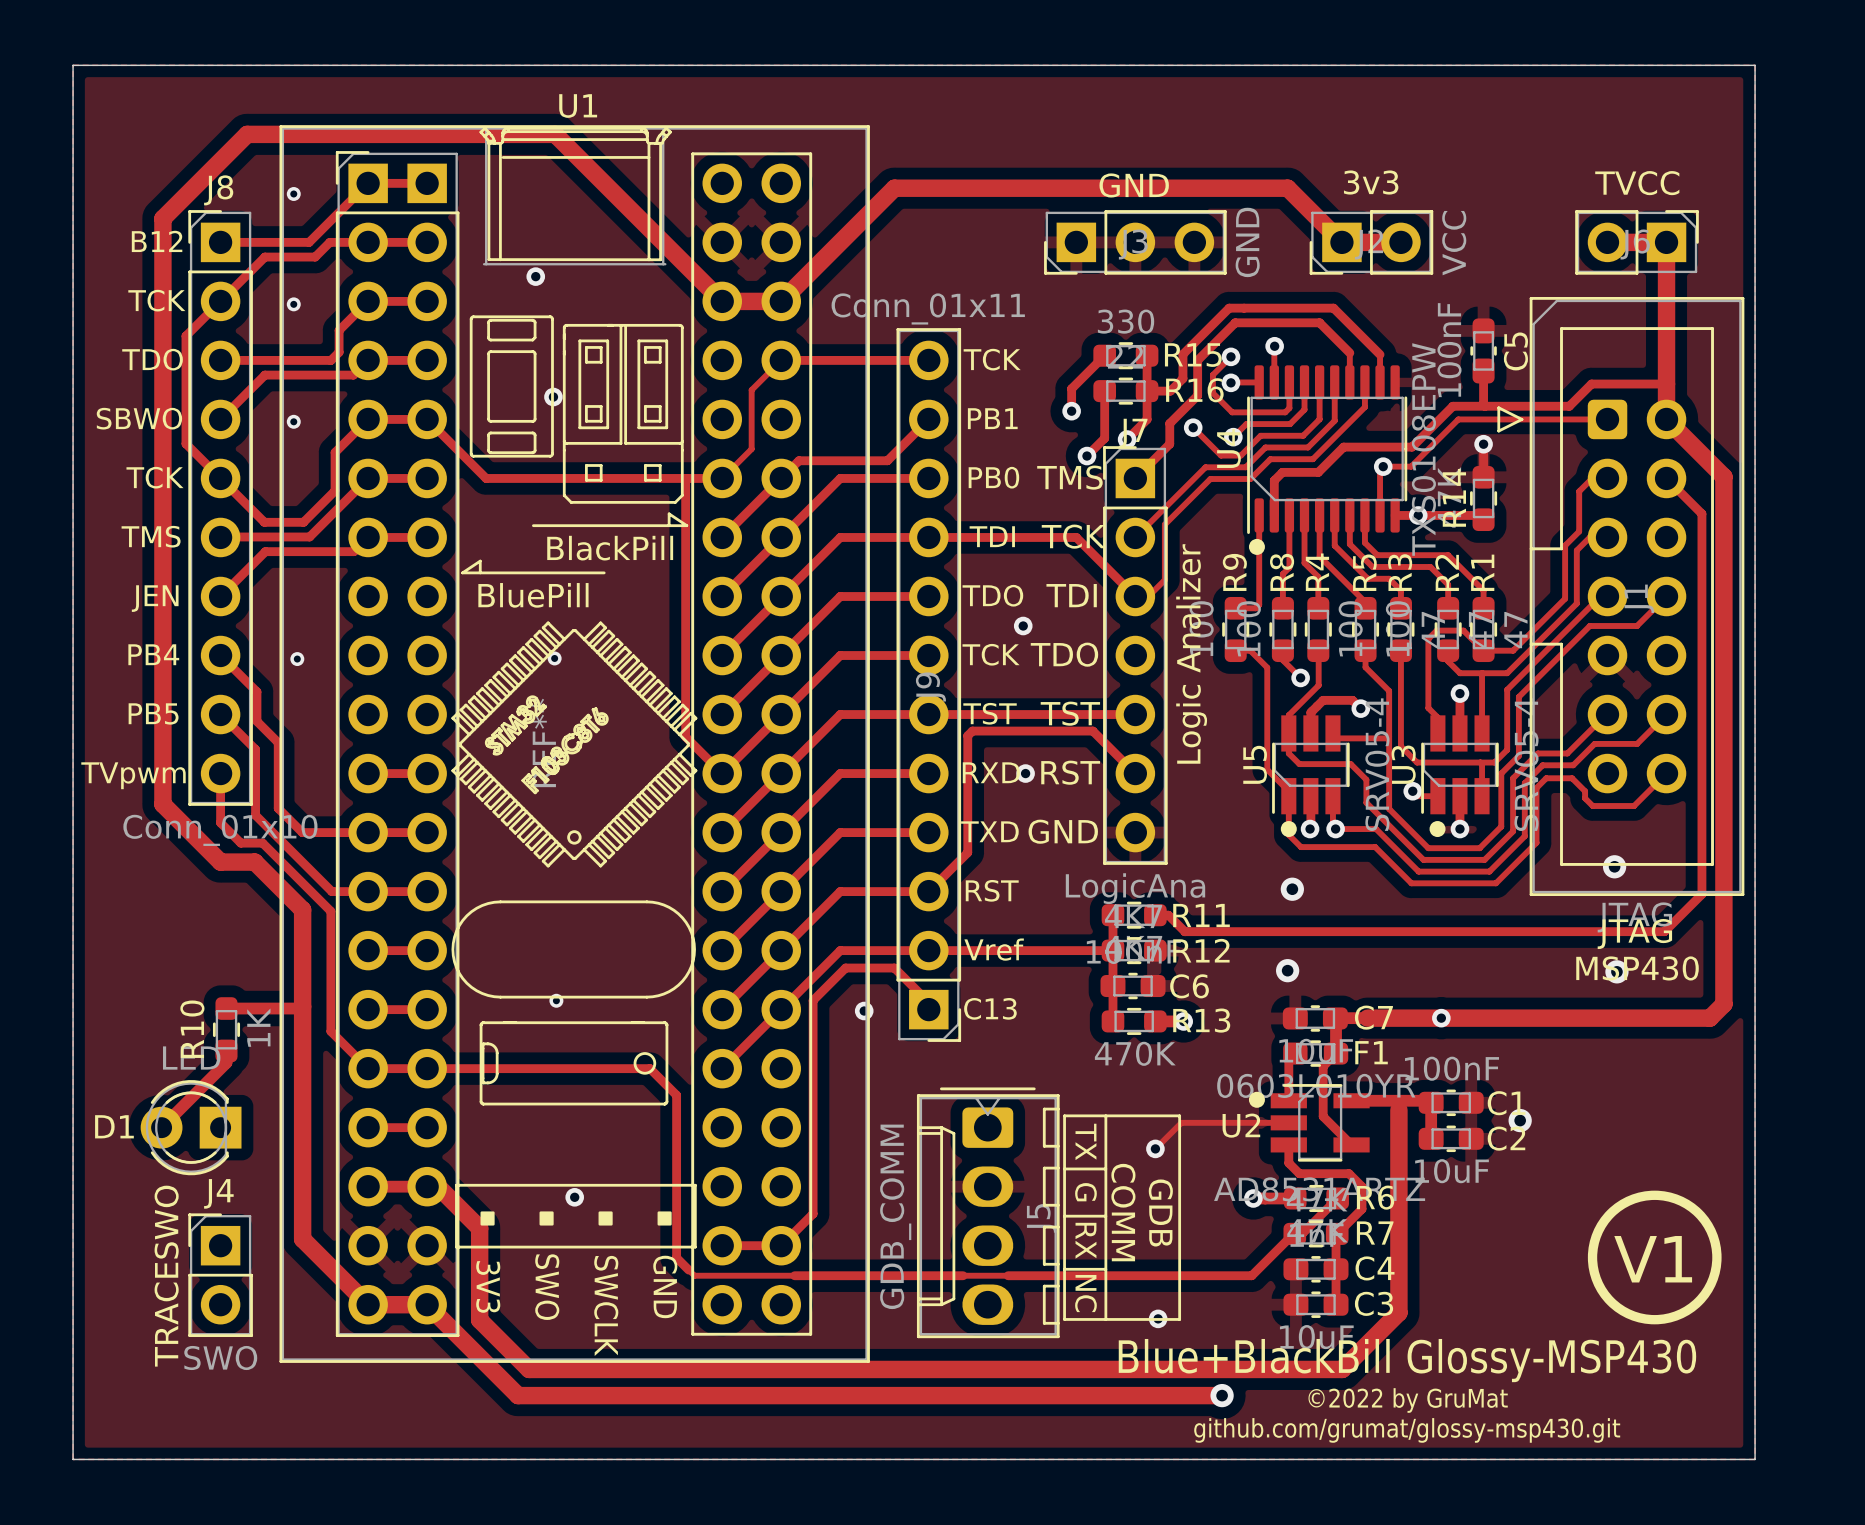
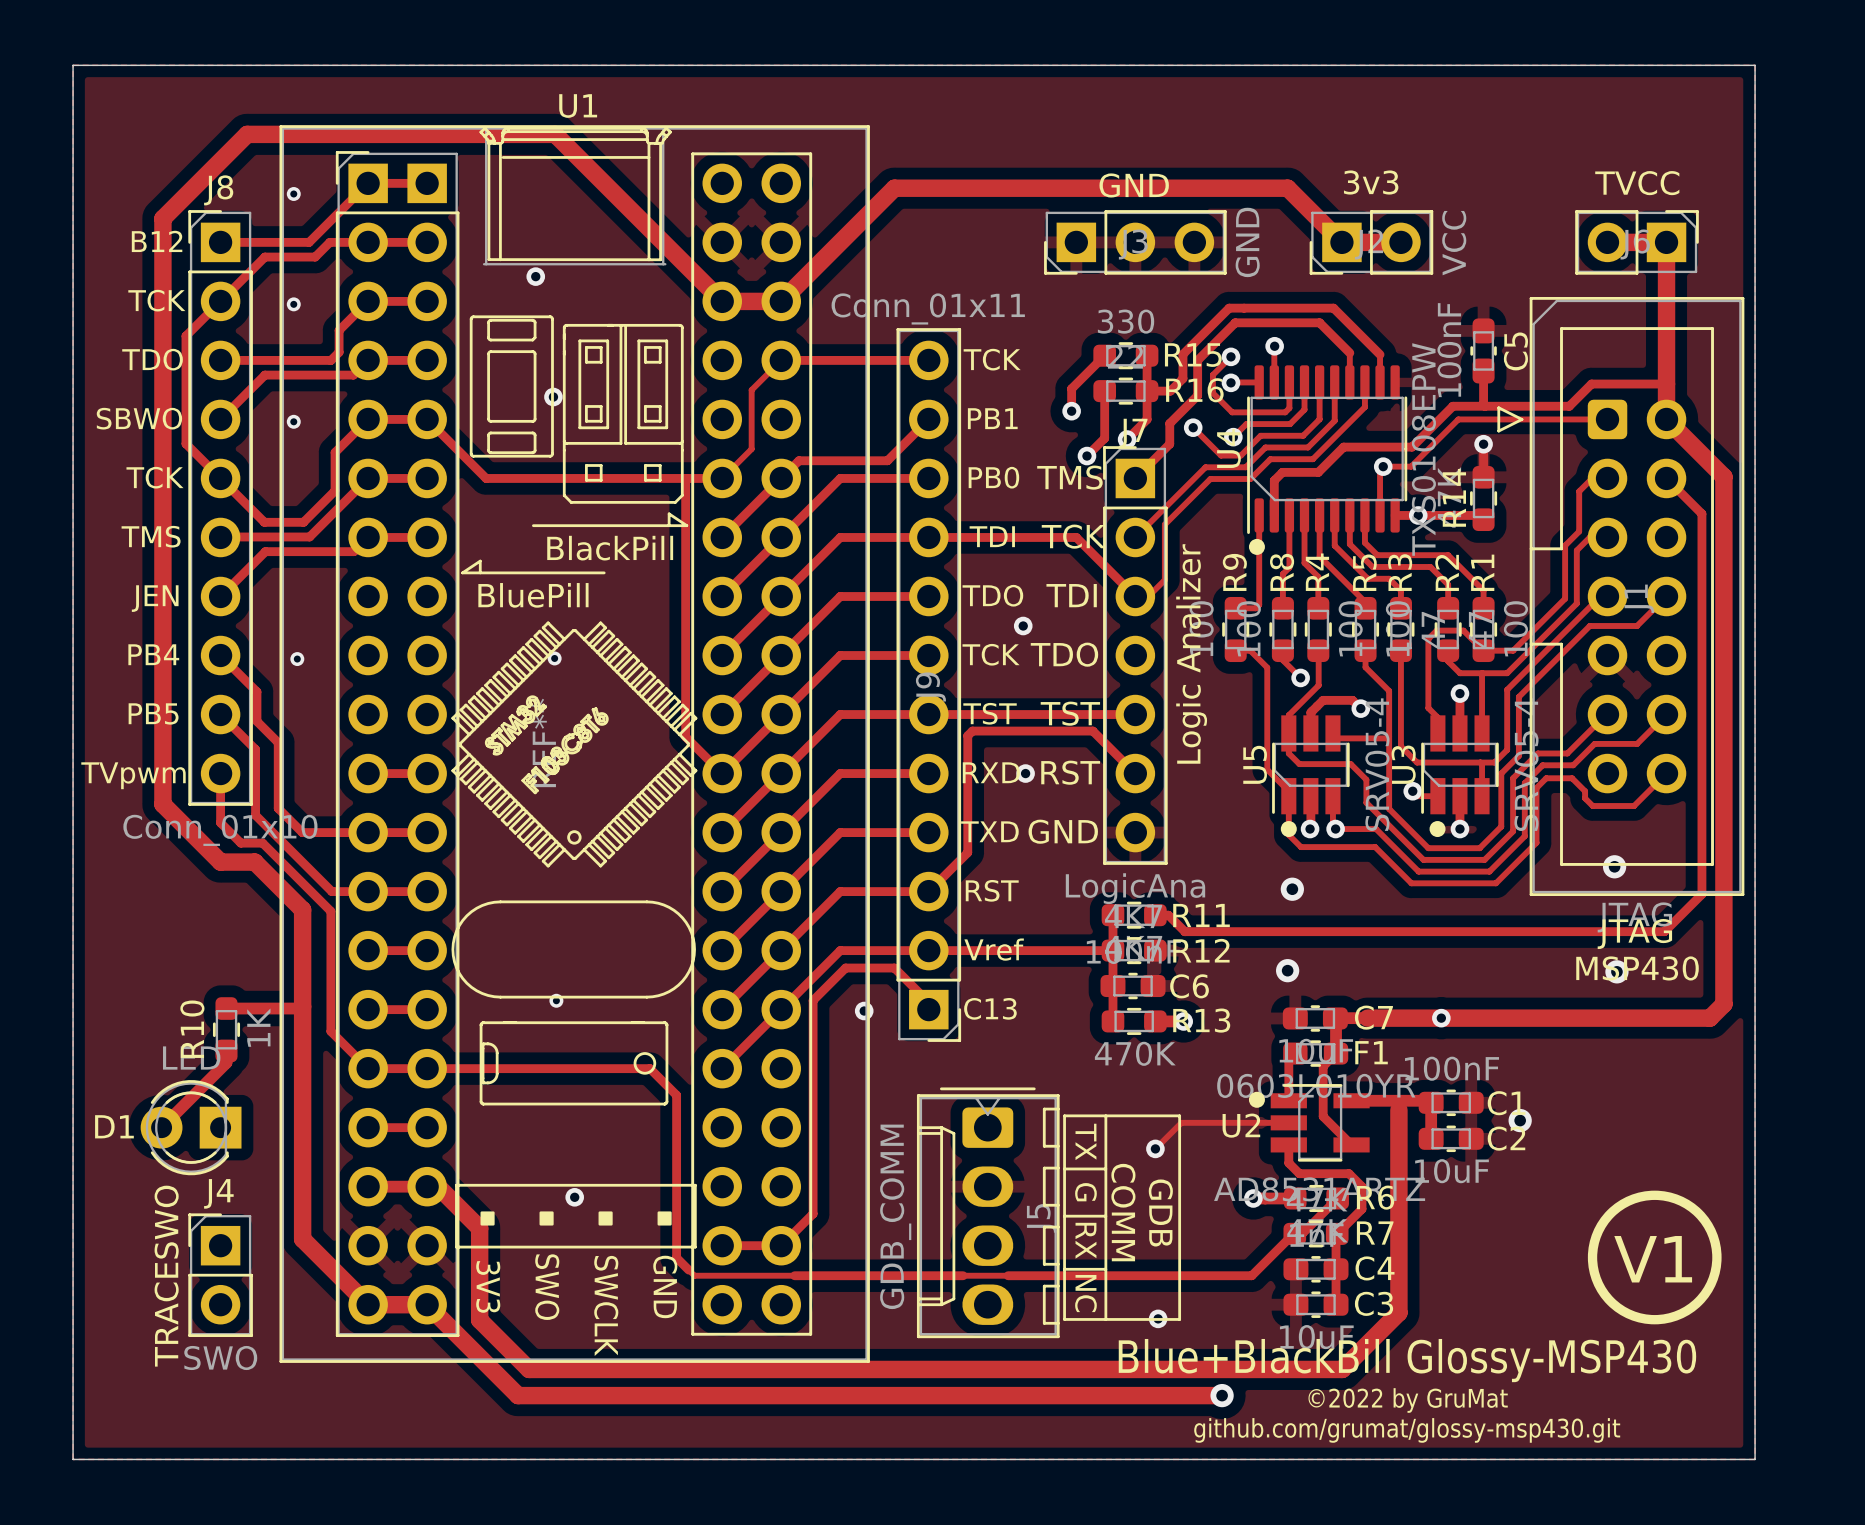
R1 value: 47 (1515, 630) -> 100 (1515, 628)

